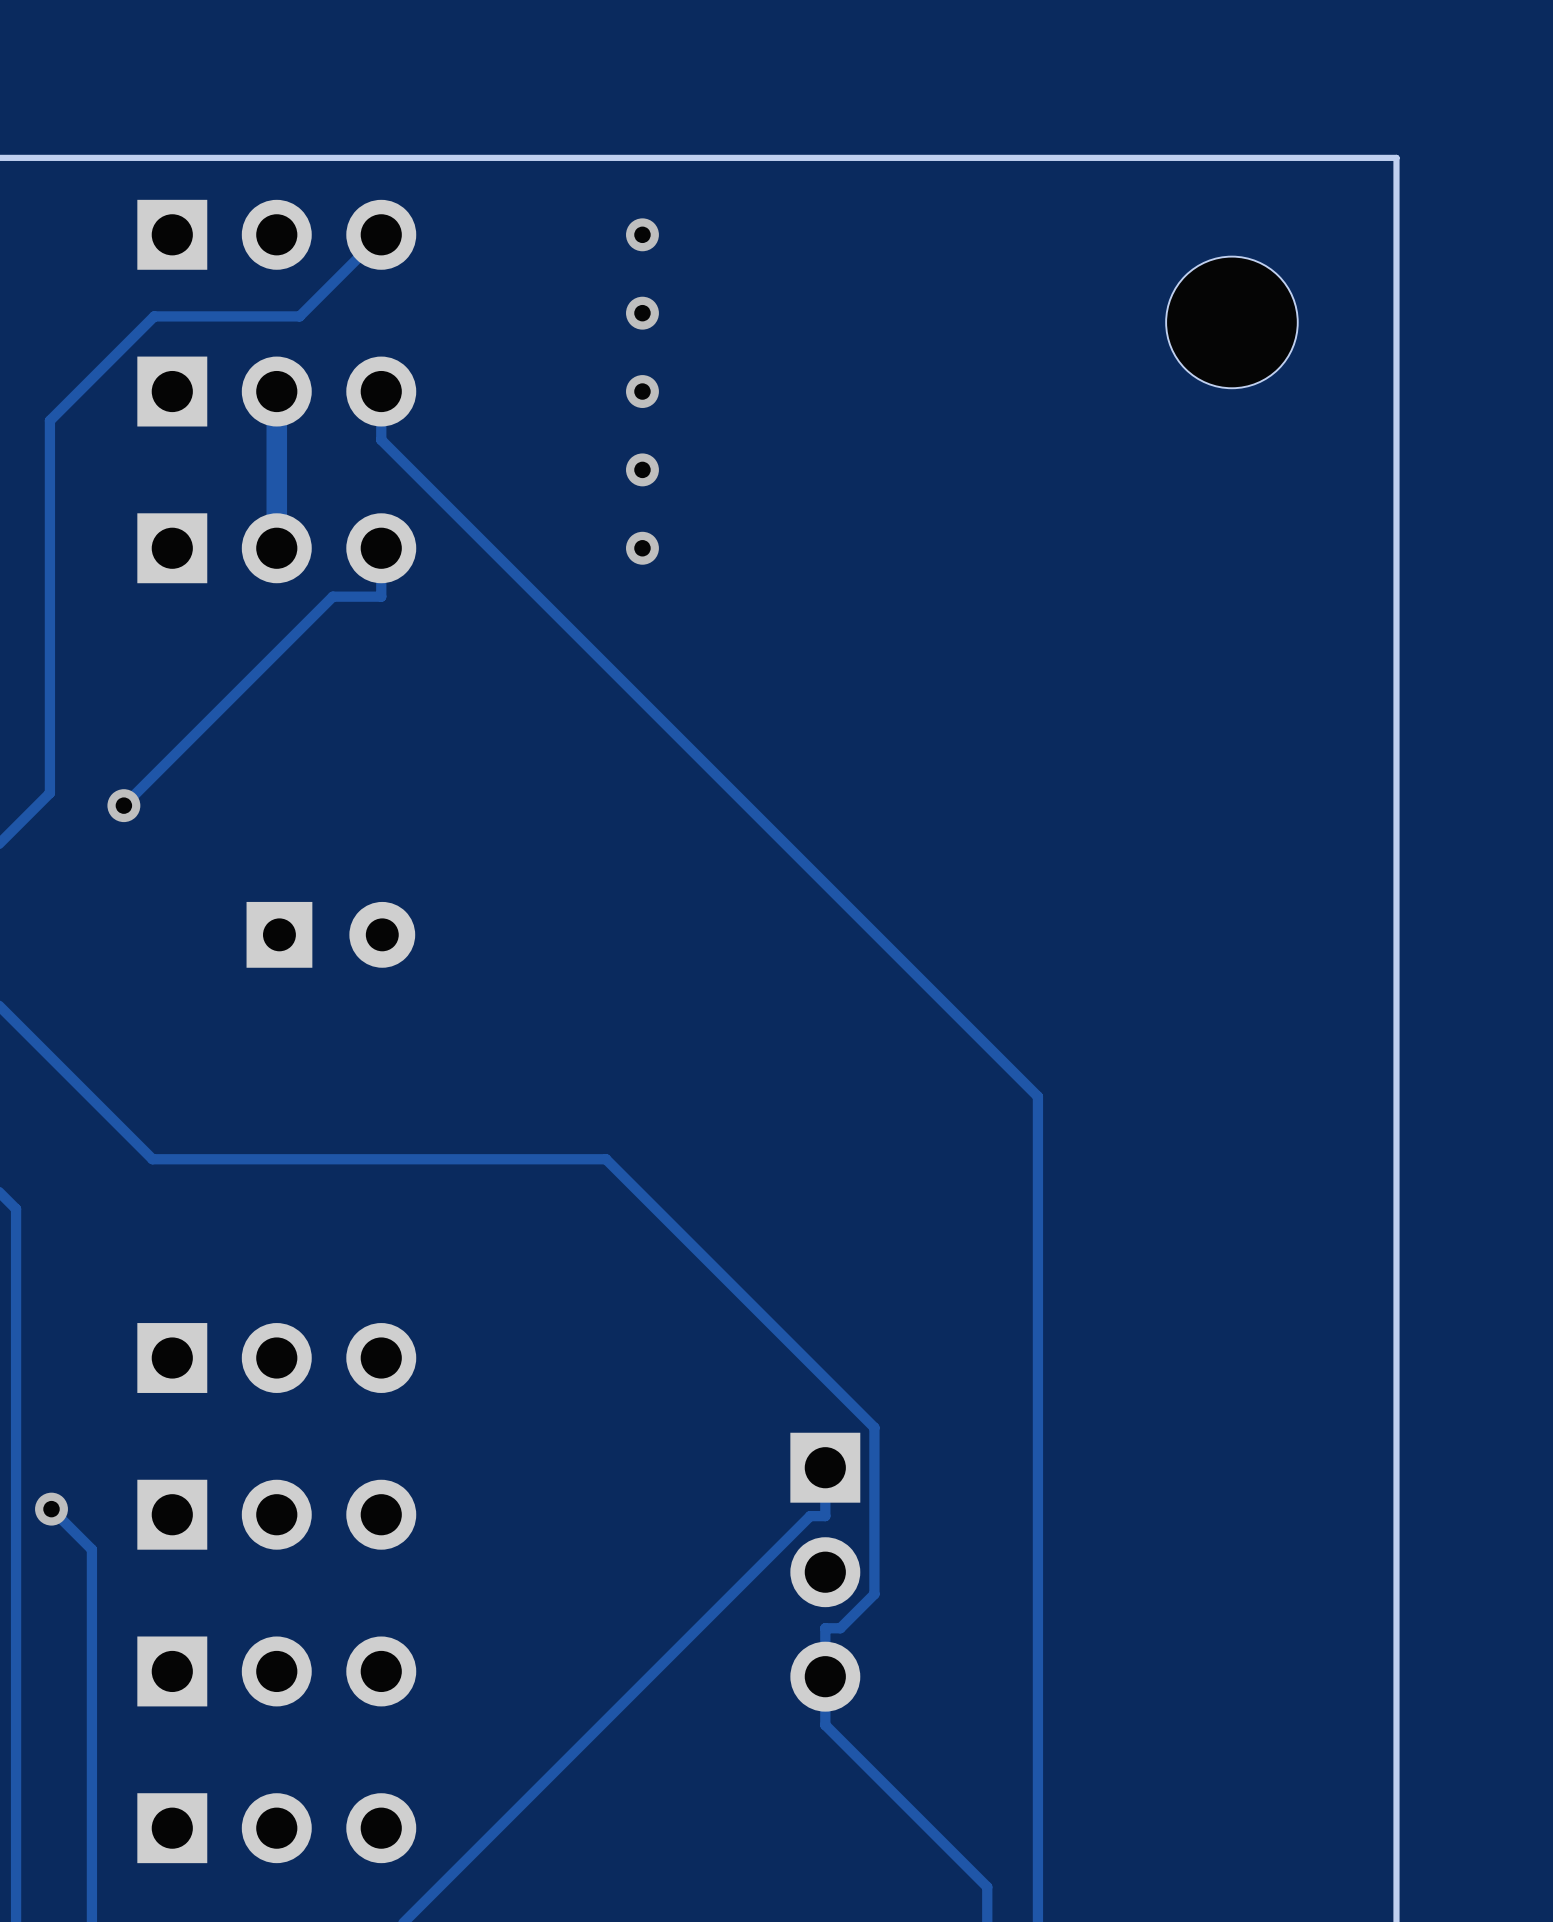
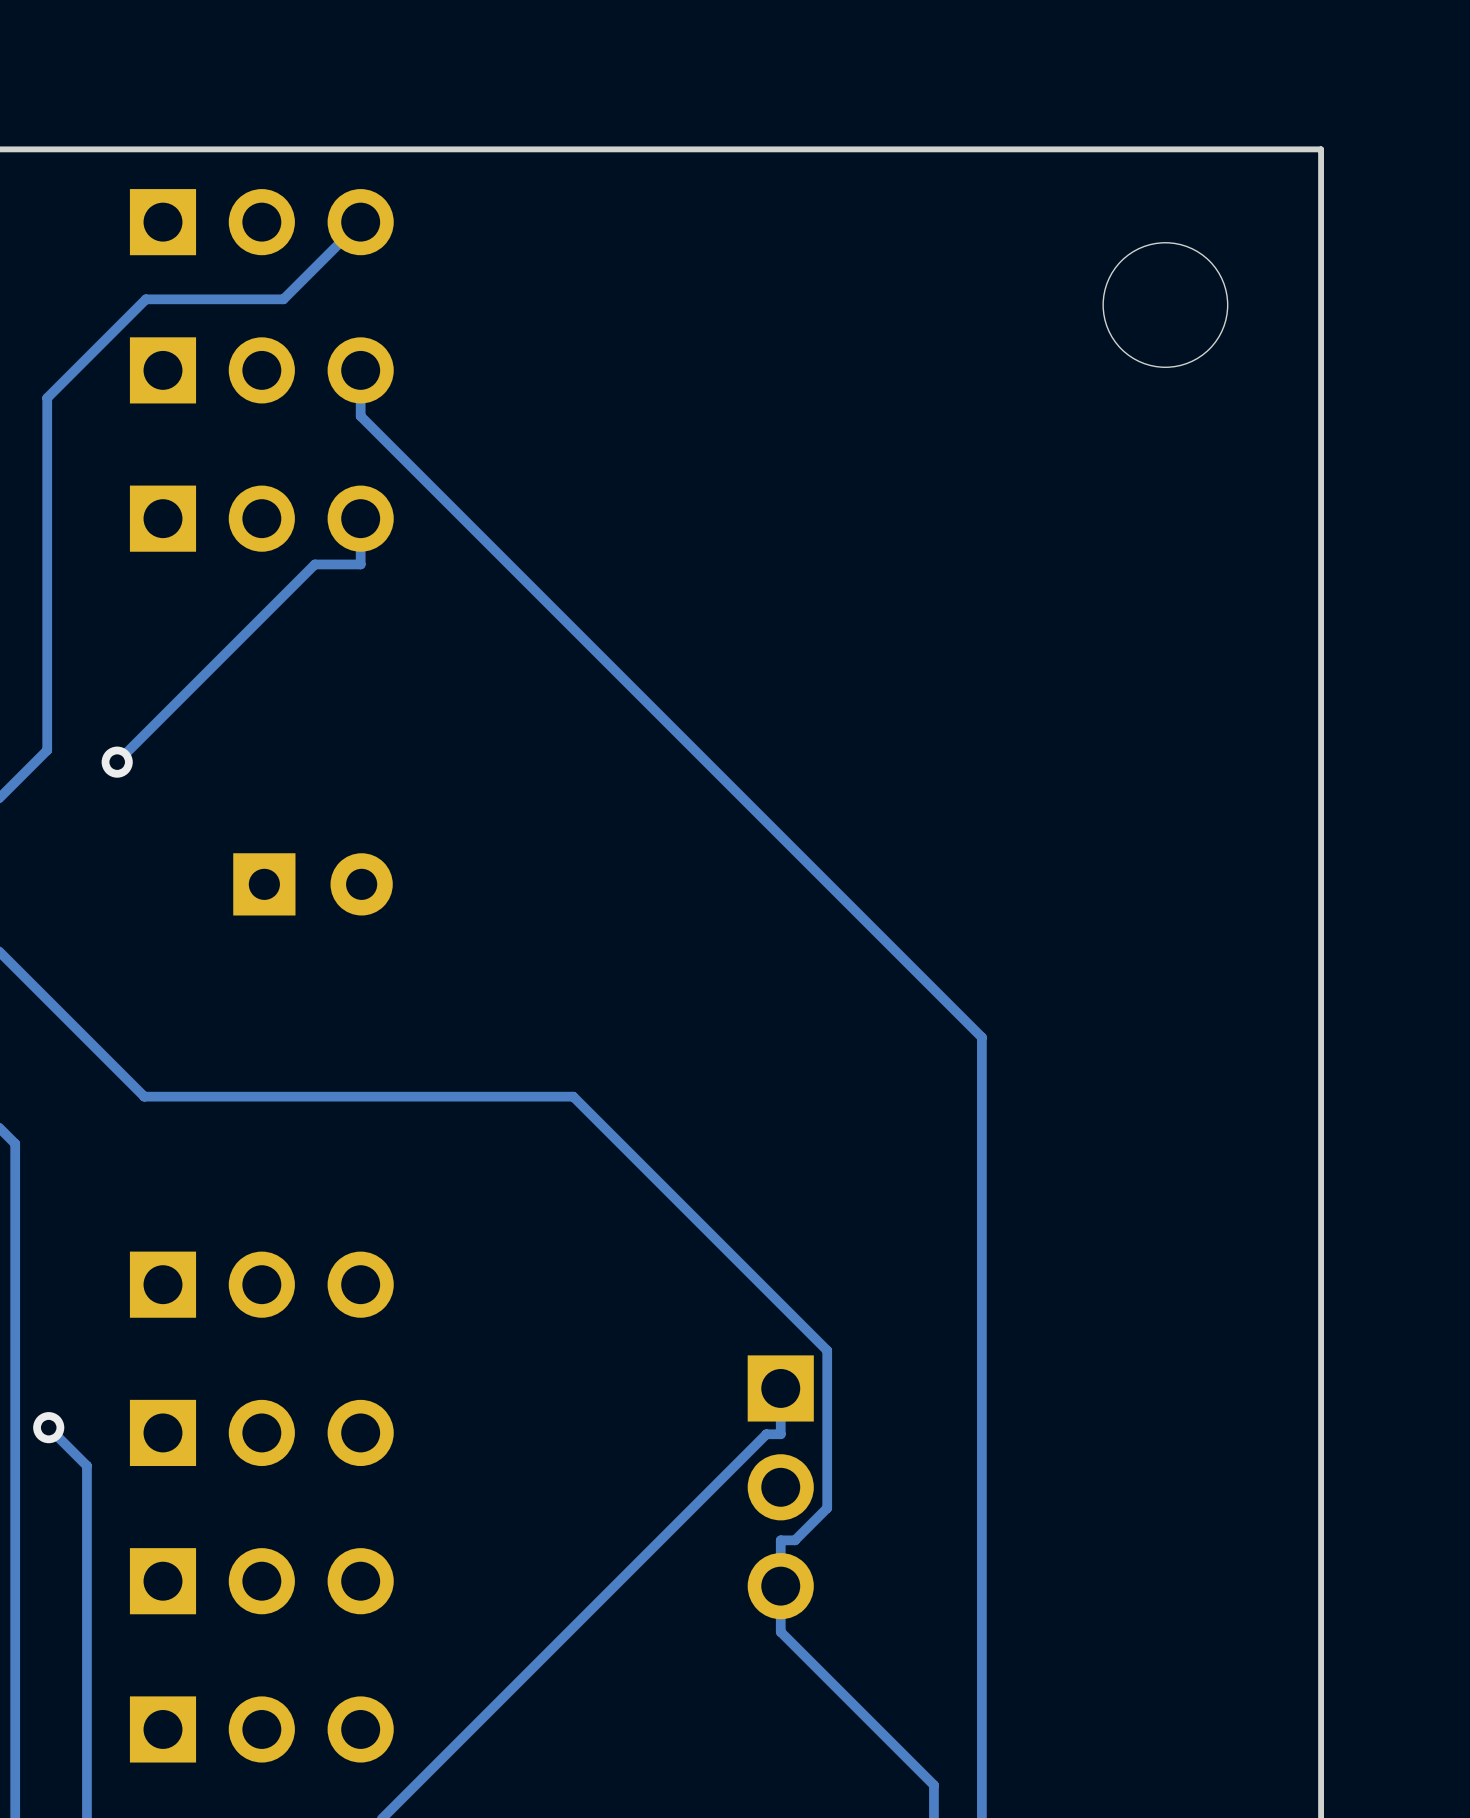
via: (642, 234) -> none
via: (642, 313) -> none
track: (276, 391) (276, 548) -> none
via: (642, 391) -> none
via: (642, 469) -> none
via: (642, 548) -> none

